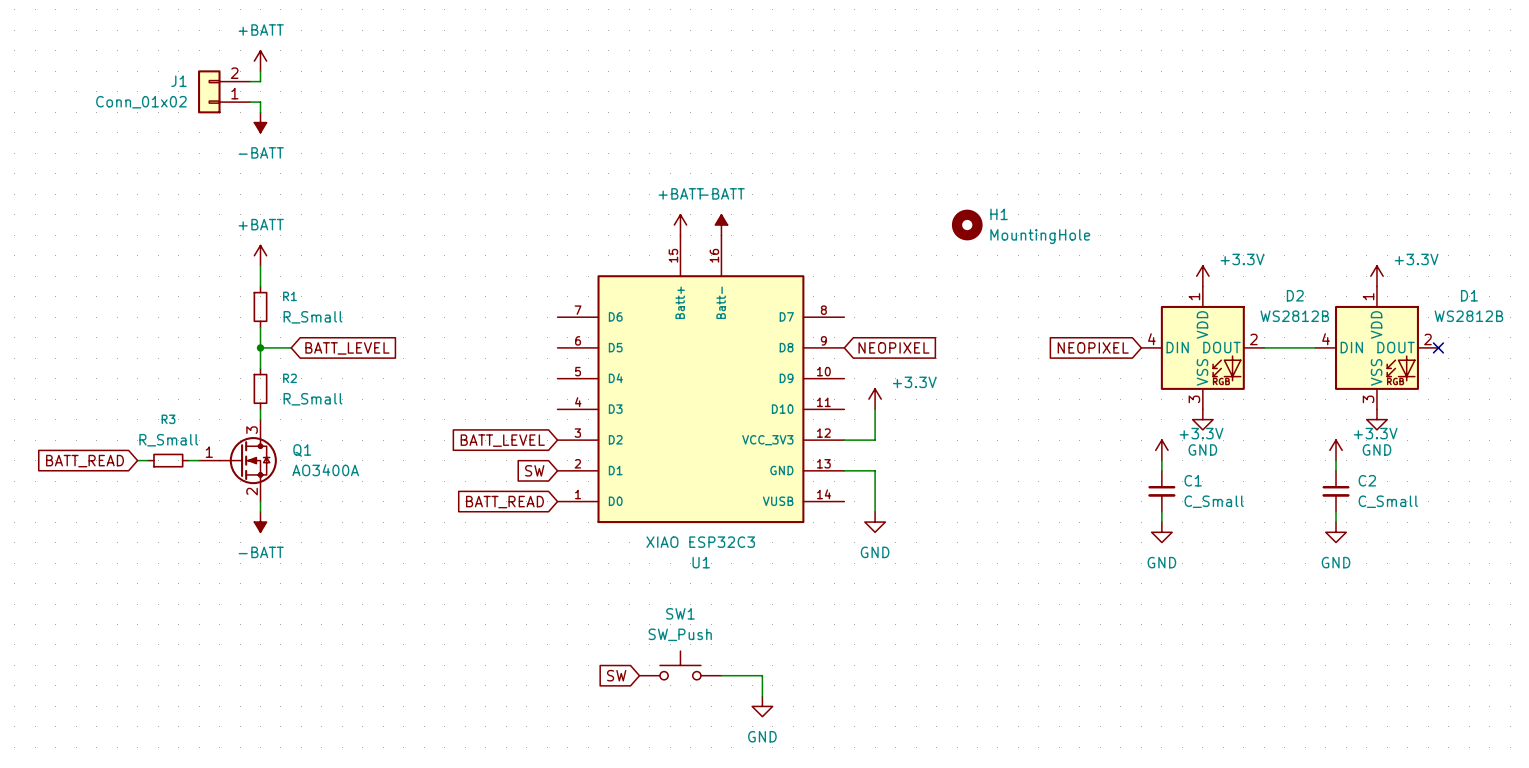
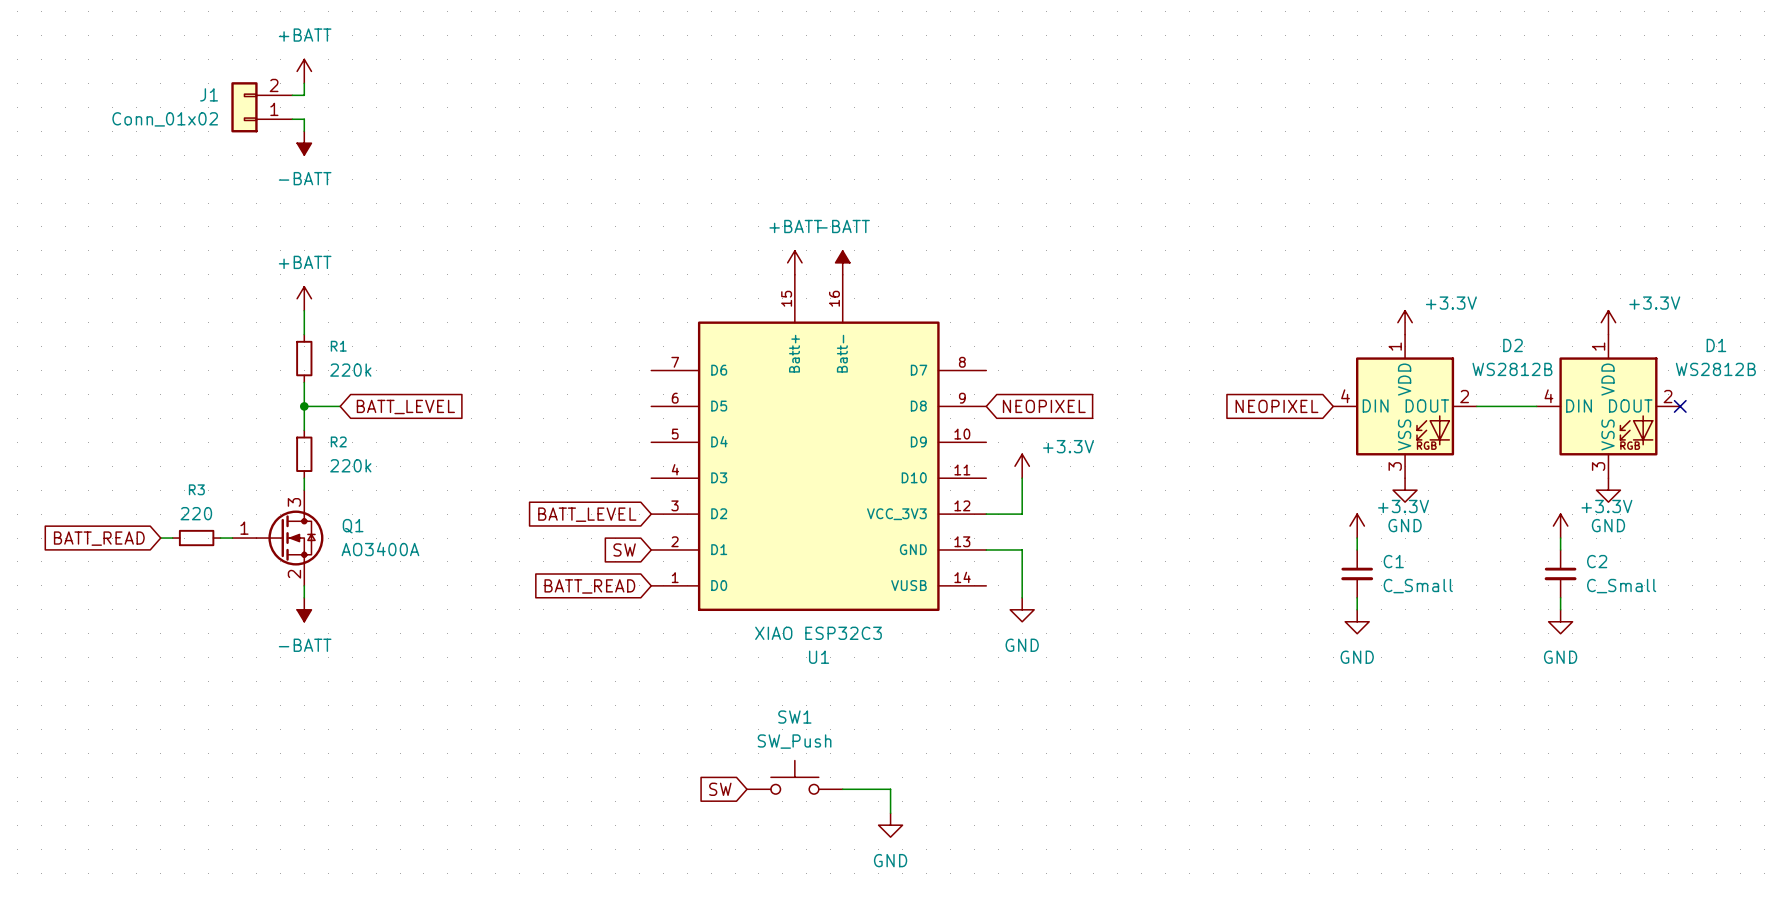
H1: MountingHole (967, 225) -> none
R1 value: R_Small (313, 317) -> 220k (350, 370)
R2 value: R_Small (313, 399) -> 220k (350, 465)
R3 value: R_Small (168, 440) -> 220 (196, 513)

